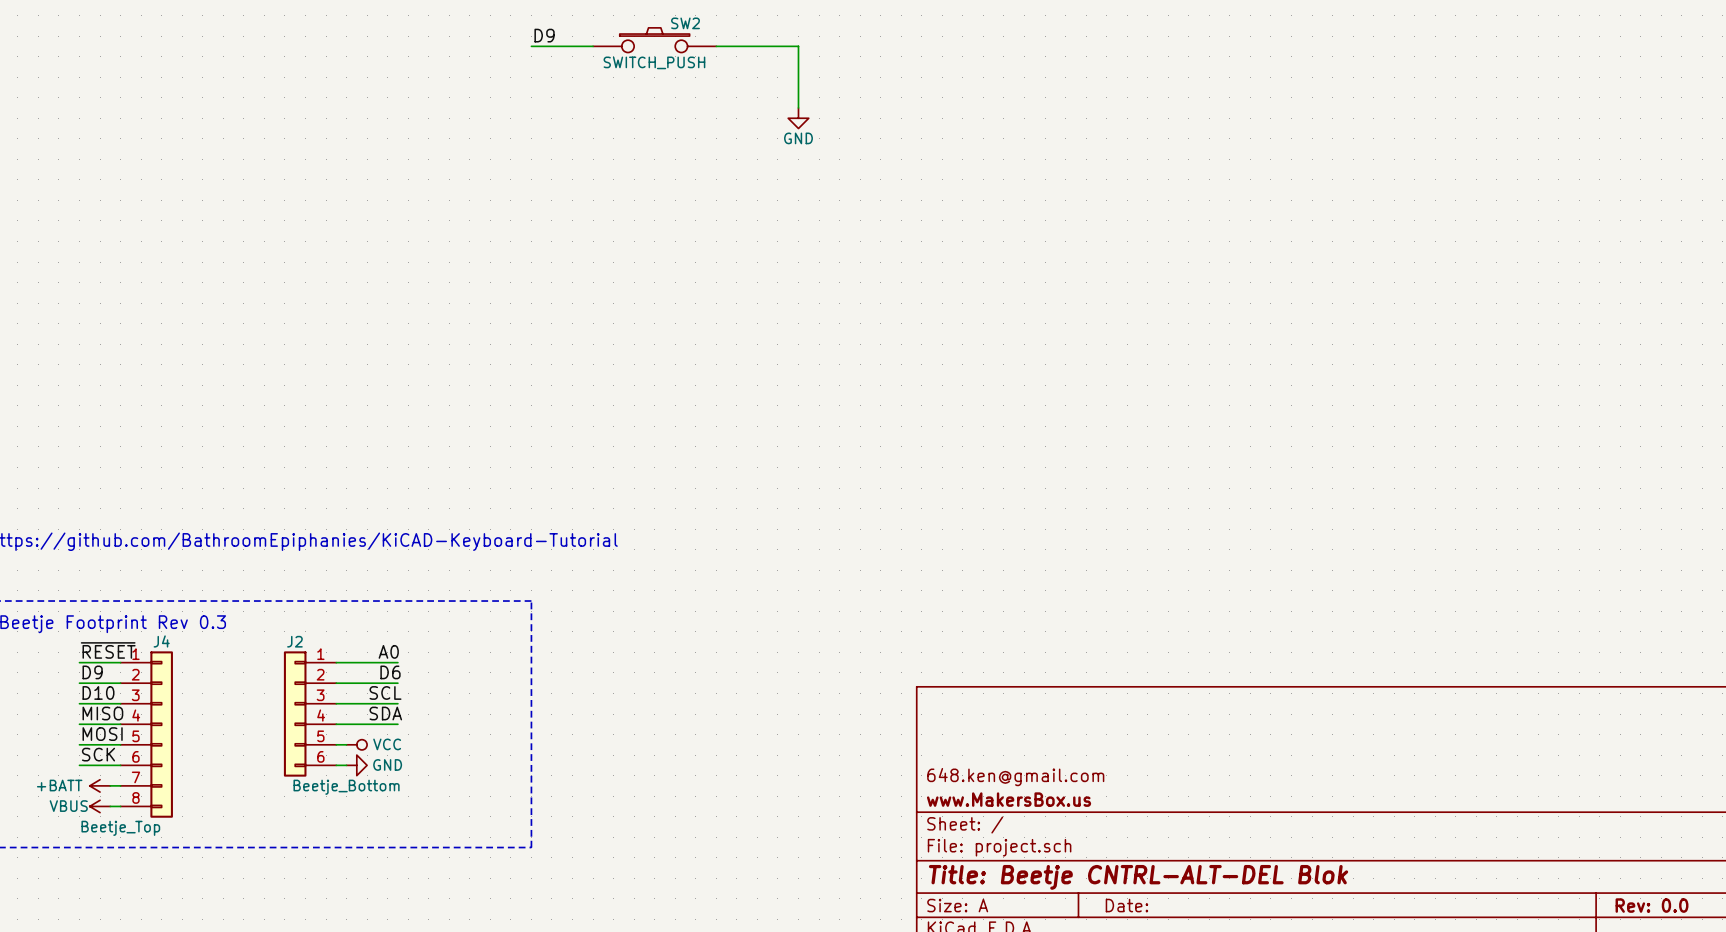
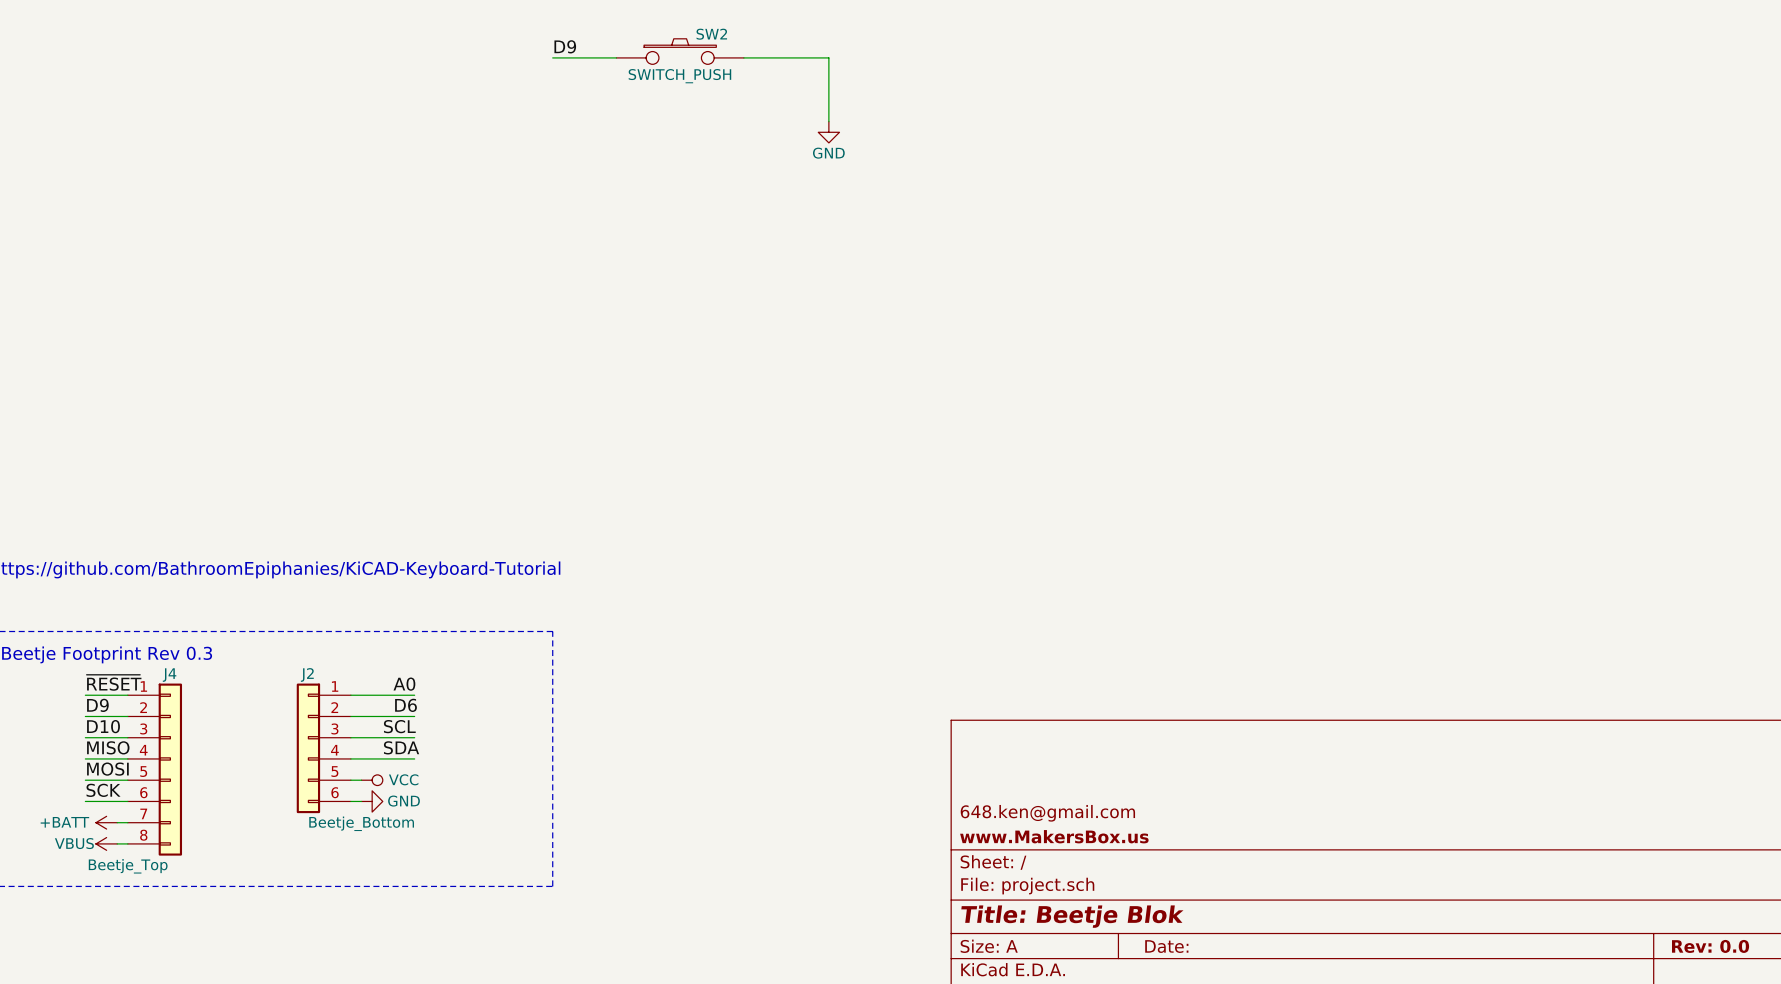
title block: Title: Beetje CNTRL-ALT-DEL Blok (1138, 877) -> Title: Beetje Blok (1072, 916)

